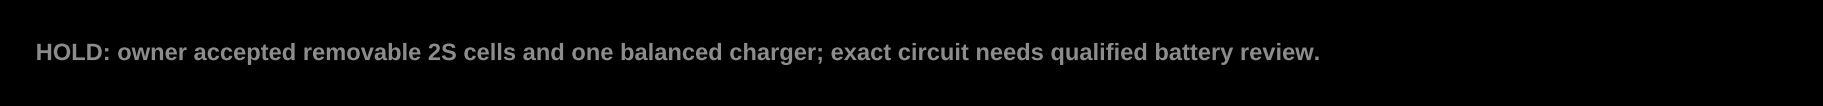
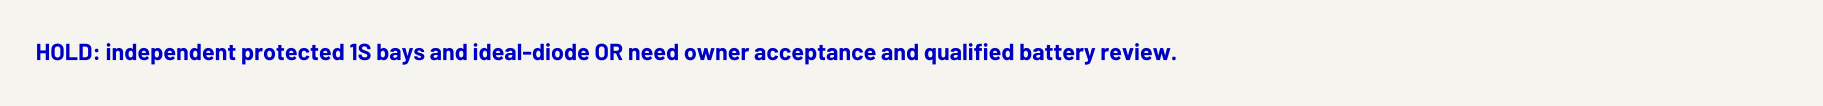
text: HOLD: owner accepted removable 2S cells and one balanced charger; exact circuit needs qualified battery review. (677, 54) -> HOLD: independent protected 1S bays and ideal-diode OR need owner acceptance and qualified battery review. (606, 53)

